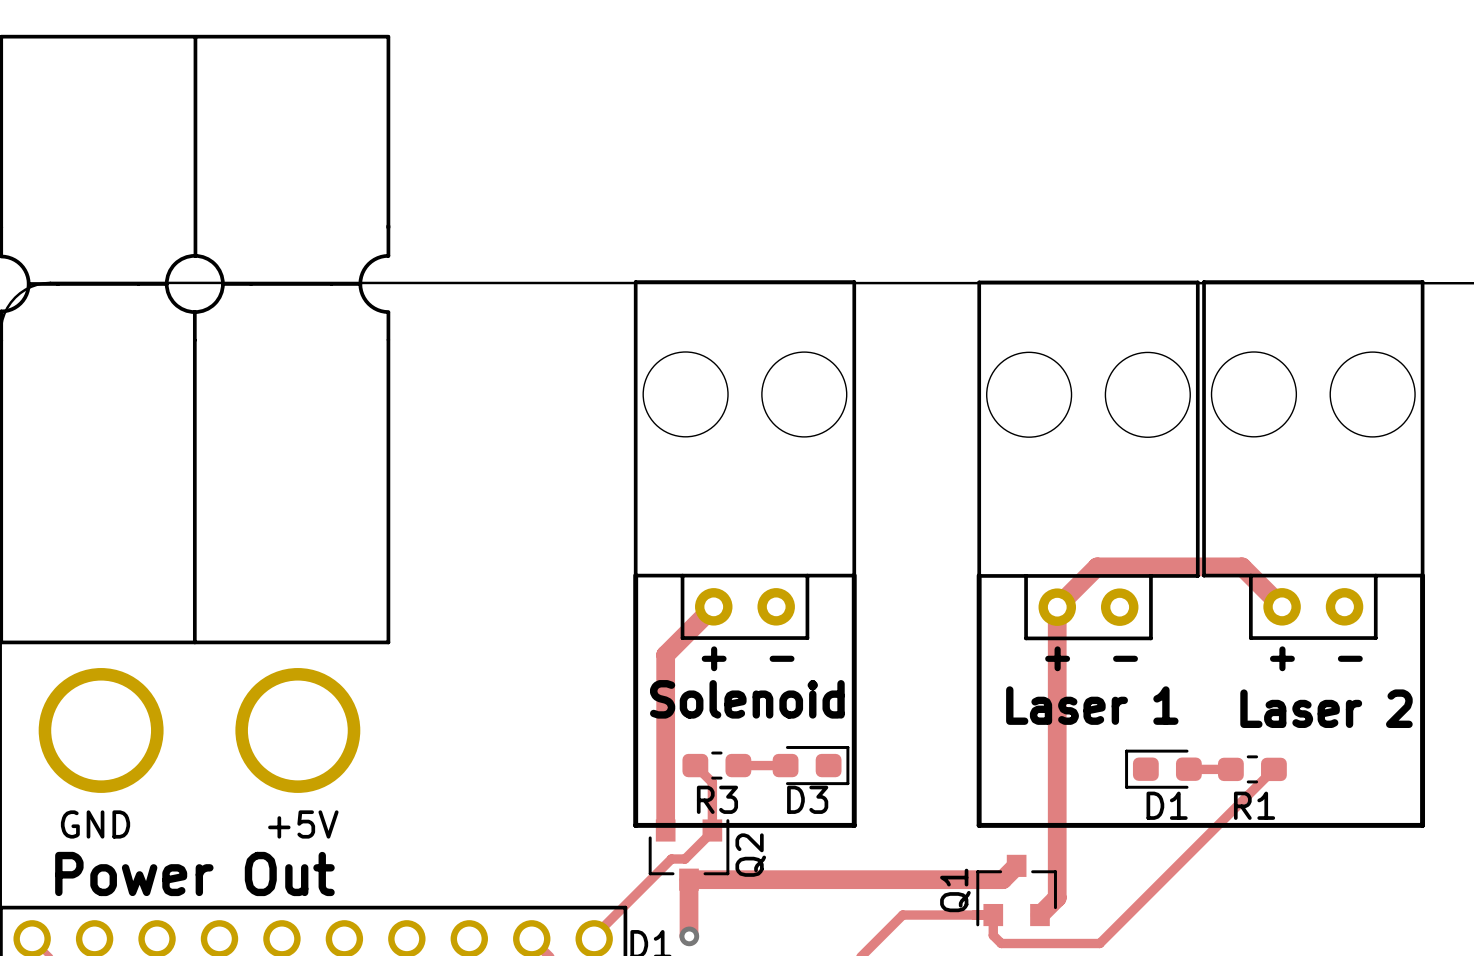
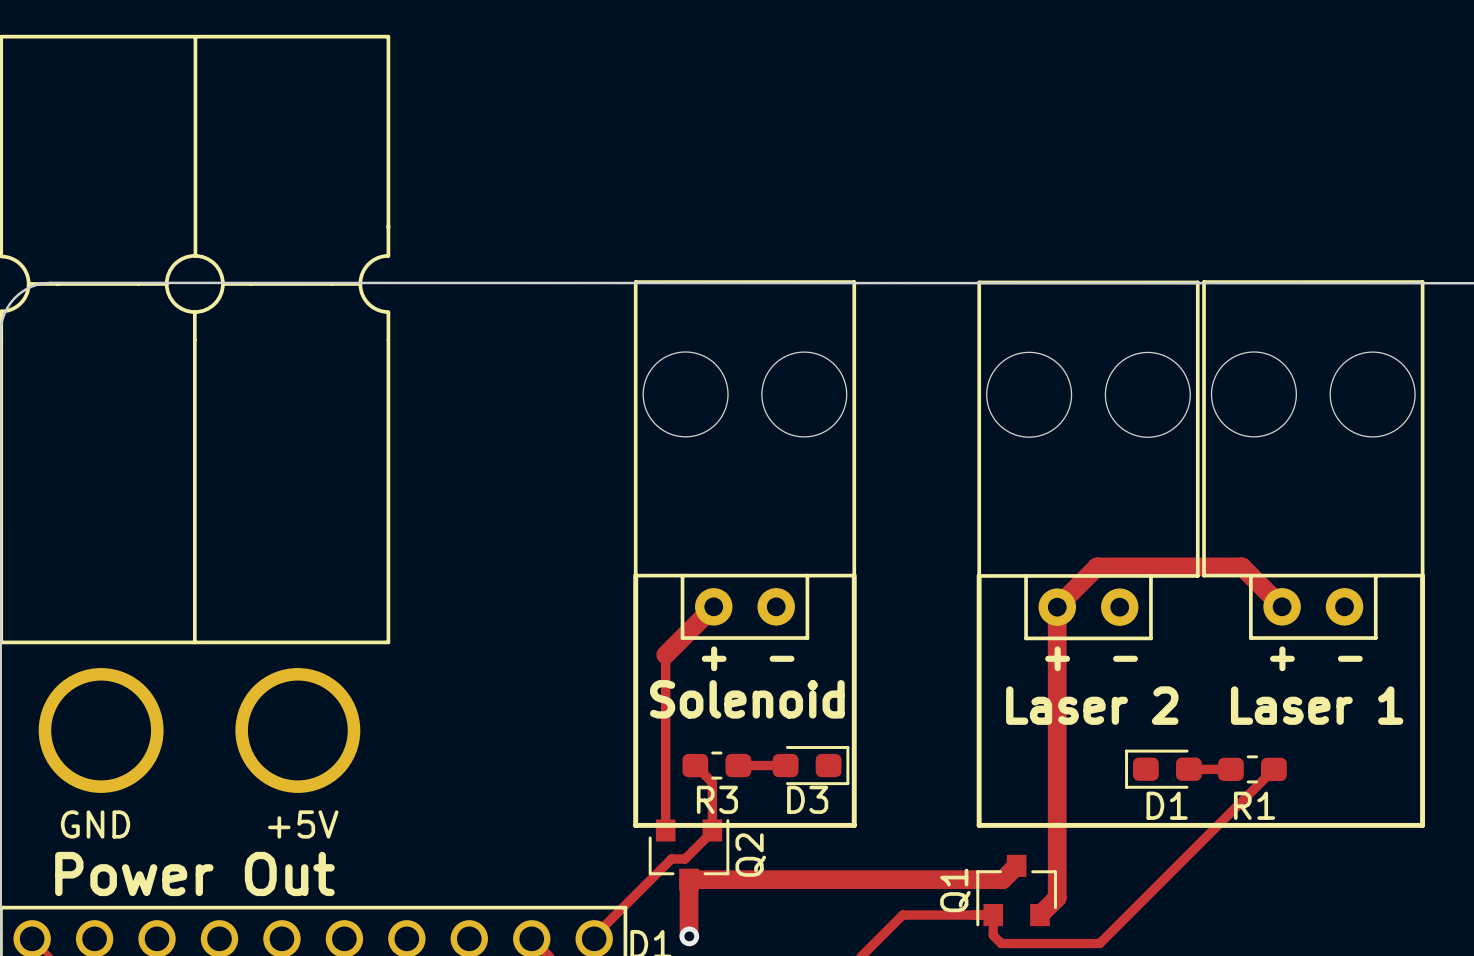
track width: thick (665, 654) (665, 830) -> thin (665, 654) (665, 830)
text: Laser 1 (1092, 705) -> Laser 2 (1092, 705)
text: Laser 2 (1326, 708) -> Laser 1 (1317, 705)

